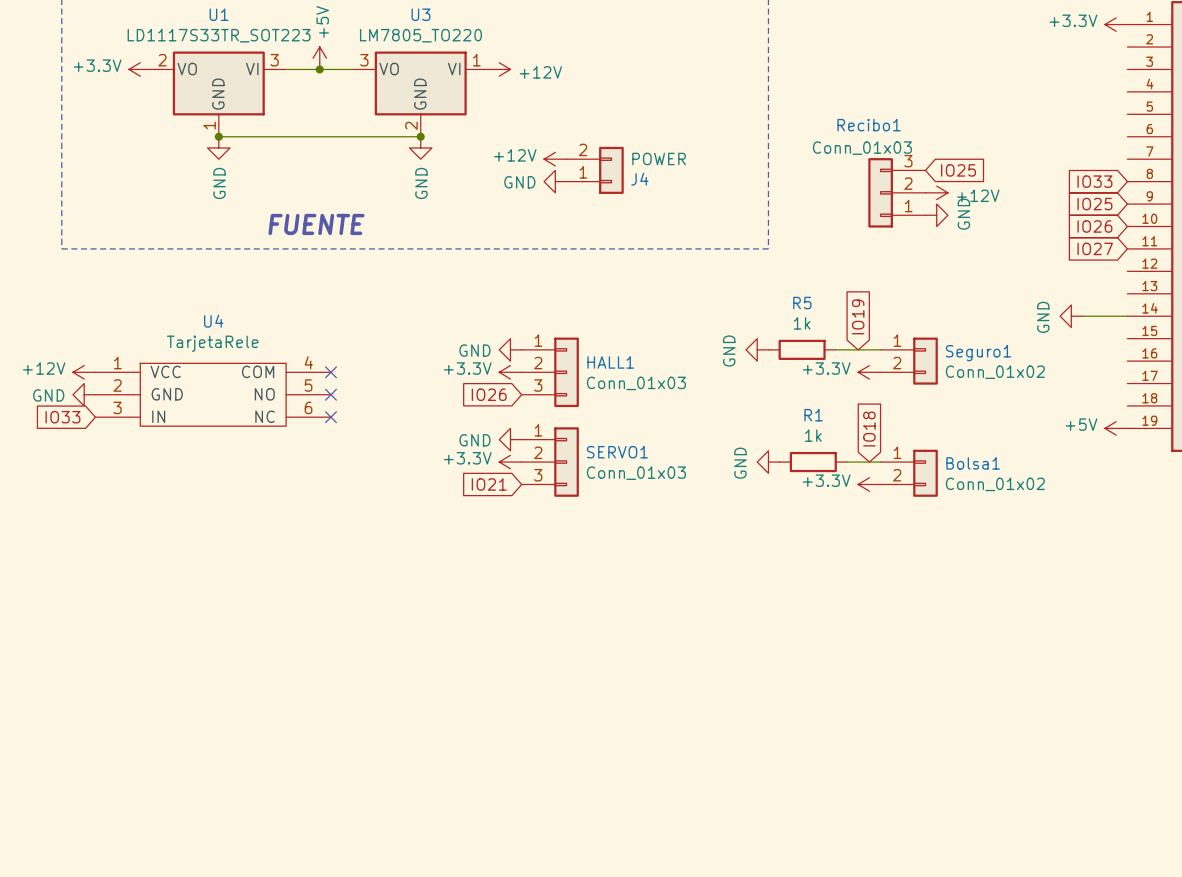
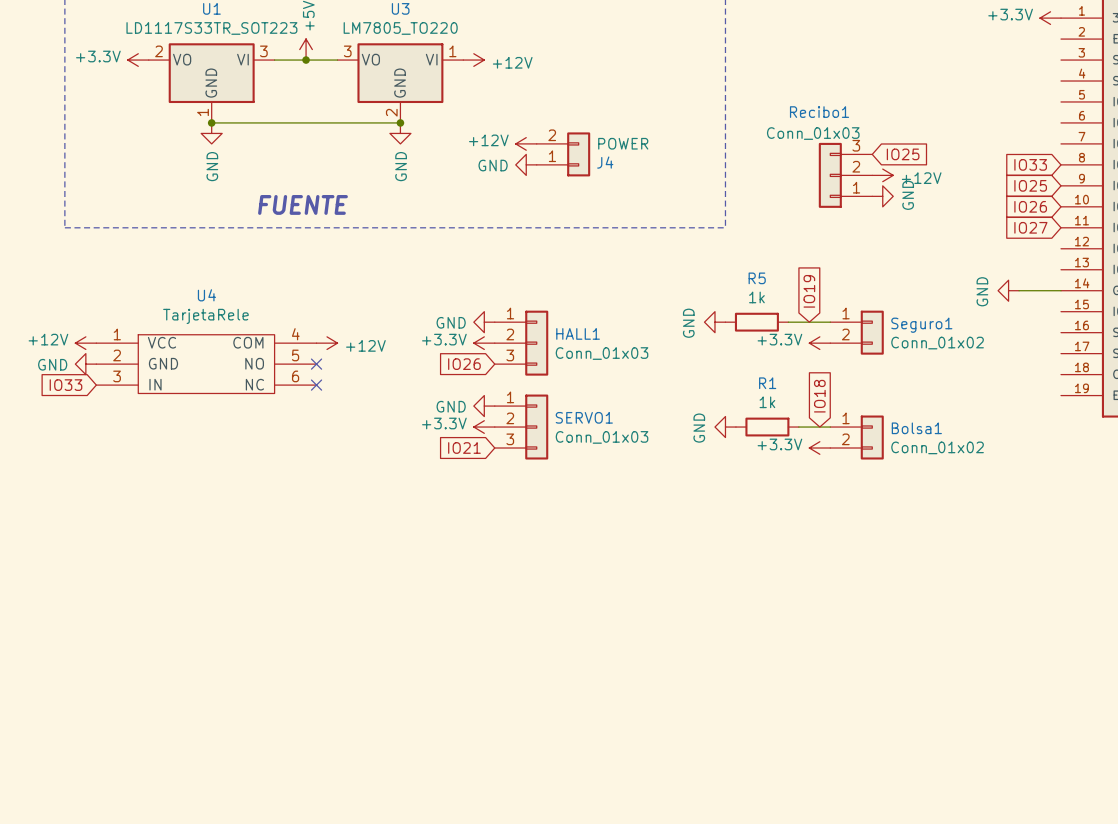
no-connect mark: (330, 372) -> none
power symbol: none -> +12V (327, 343)
power symbol: +5V (1116, 428) -> none

